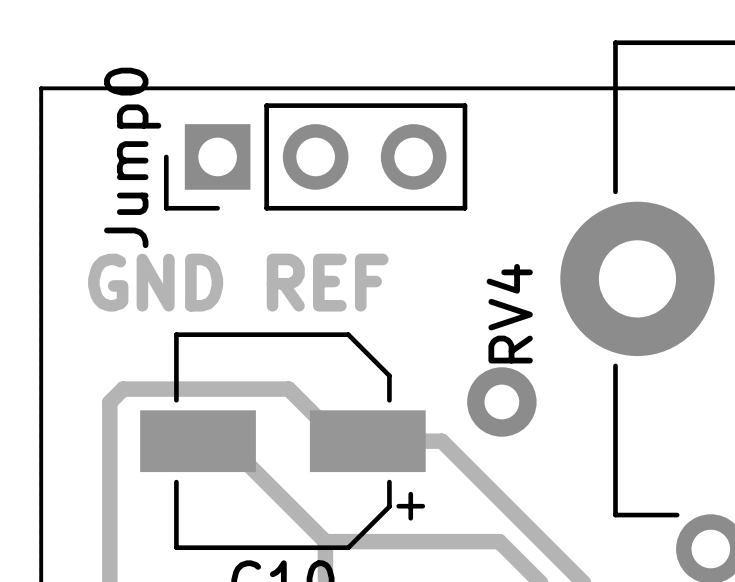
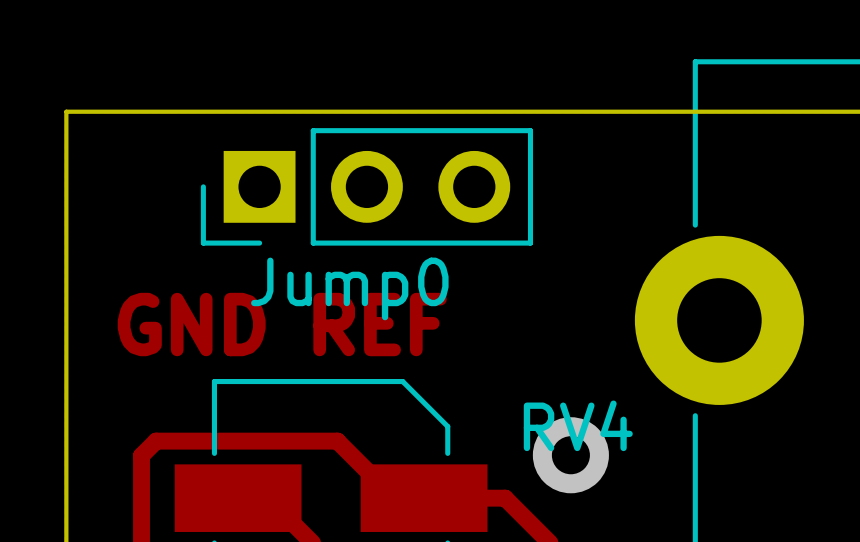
Jump0 name rotation: 0° (132, 157) -> 90° clockwise (349, 288)
RV4 name rotation: 0° (509, 313) -> 90° clockwise (578, 425)

